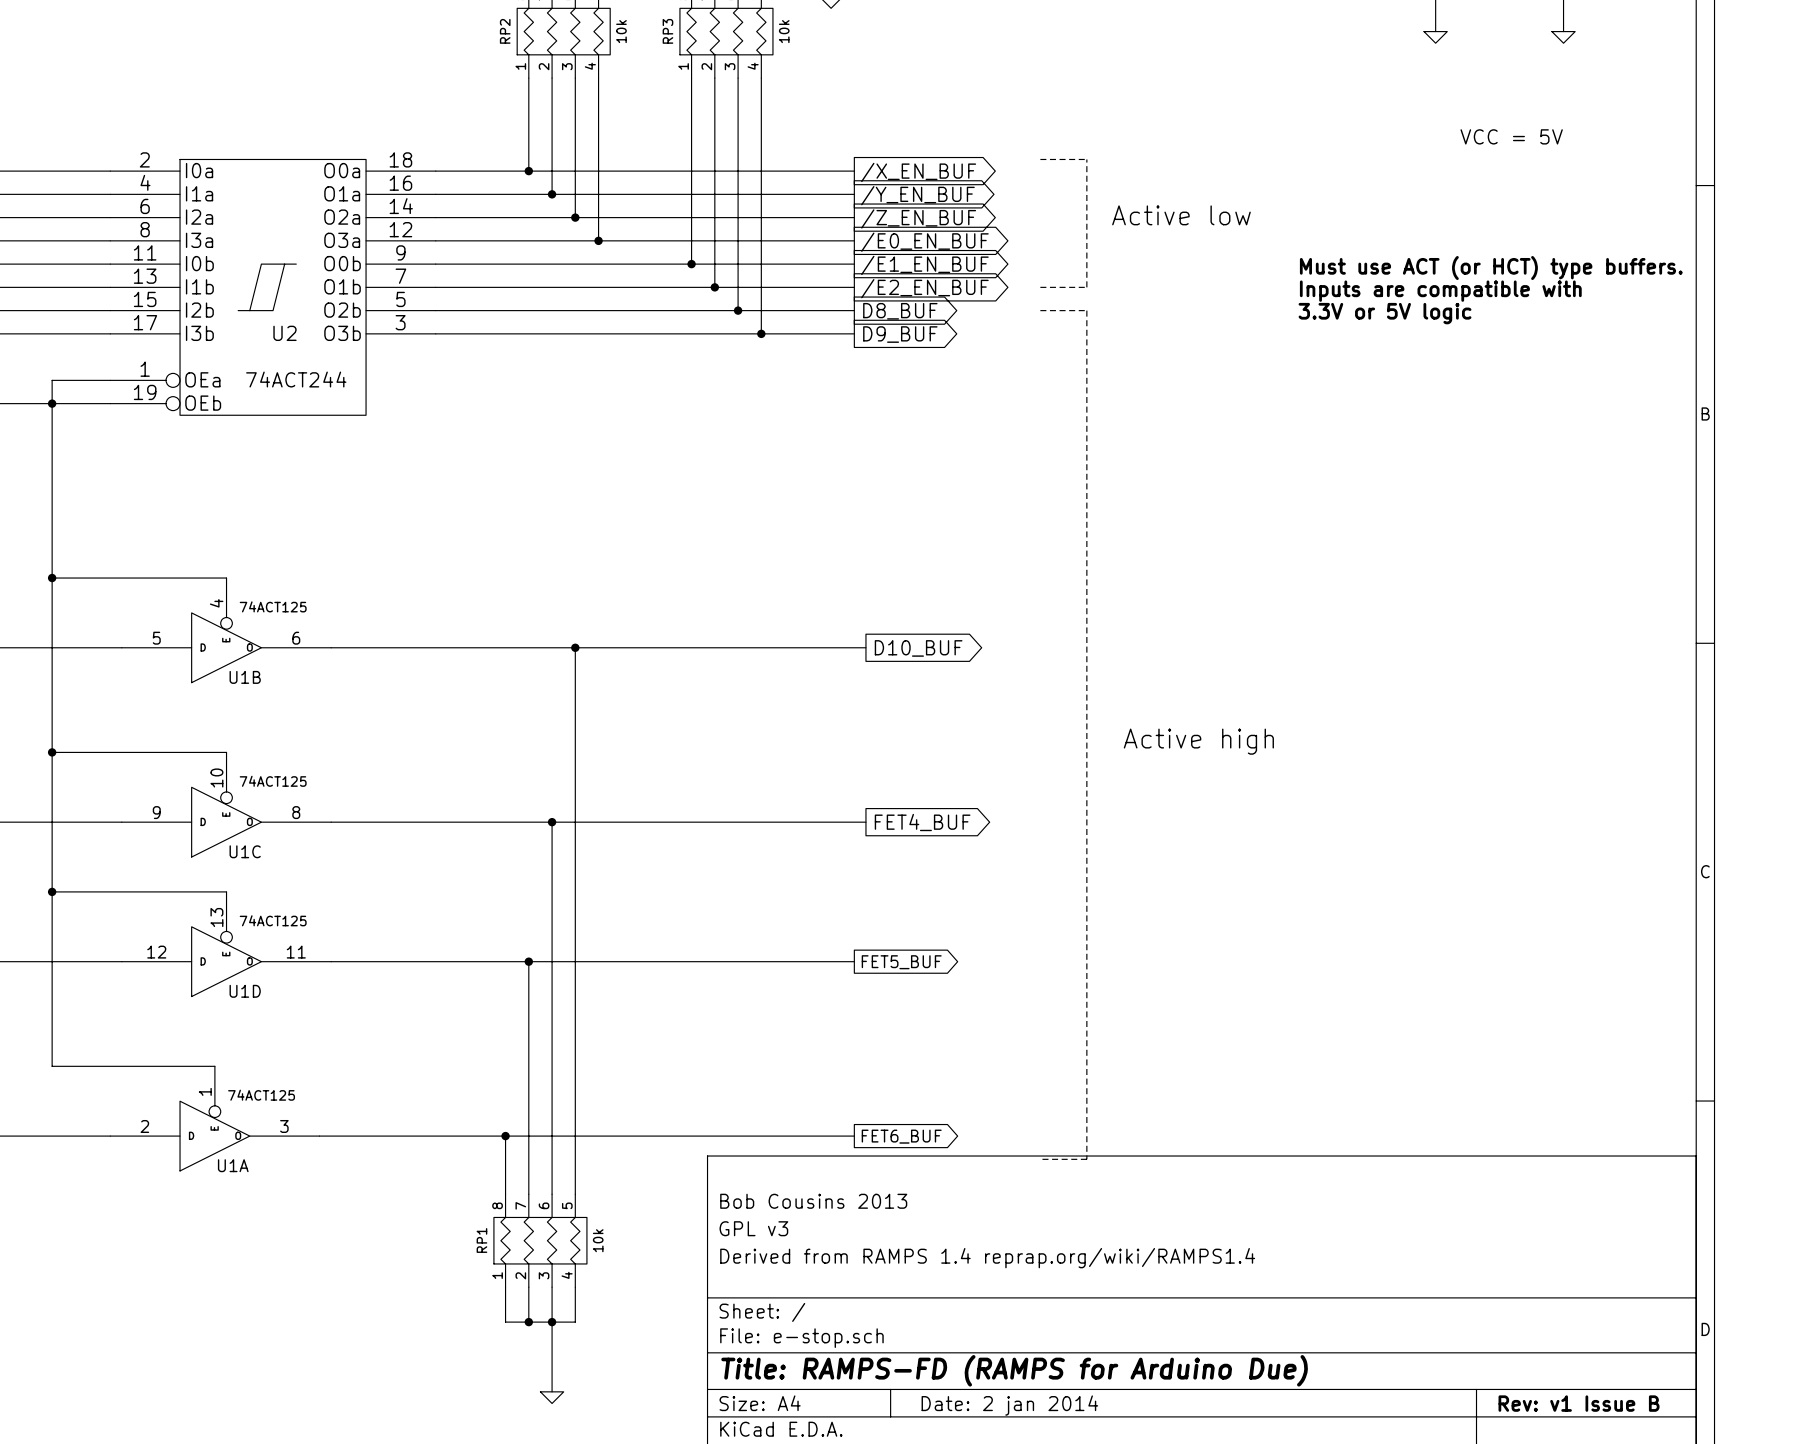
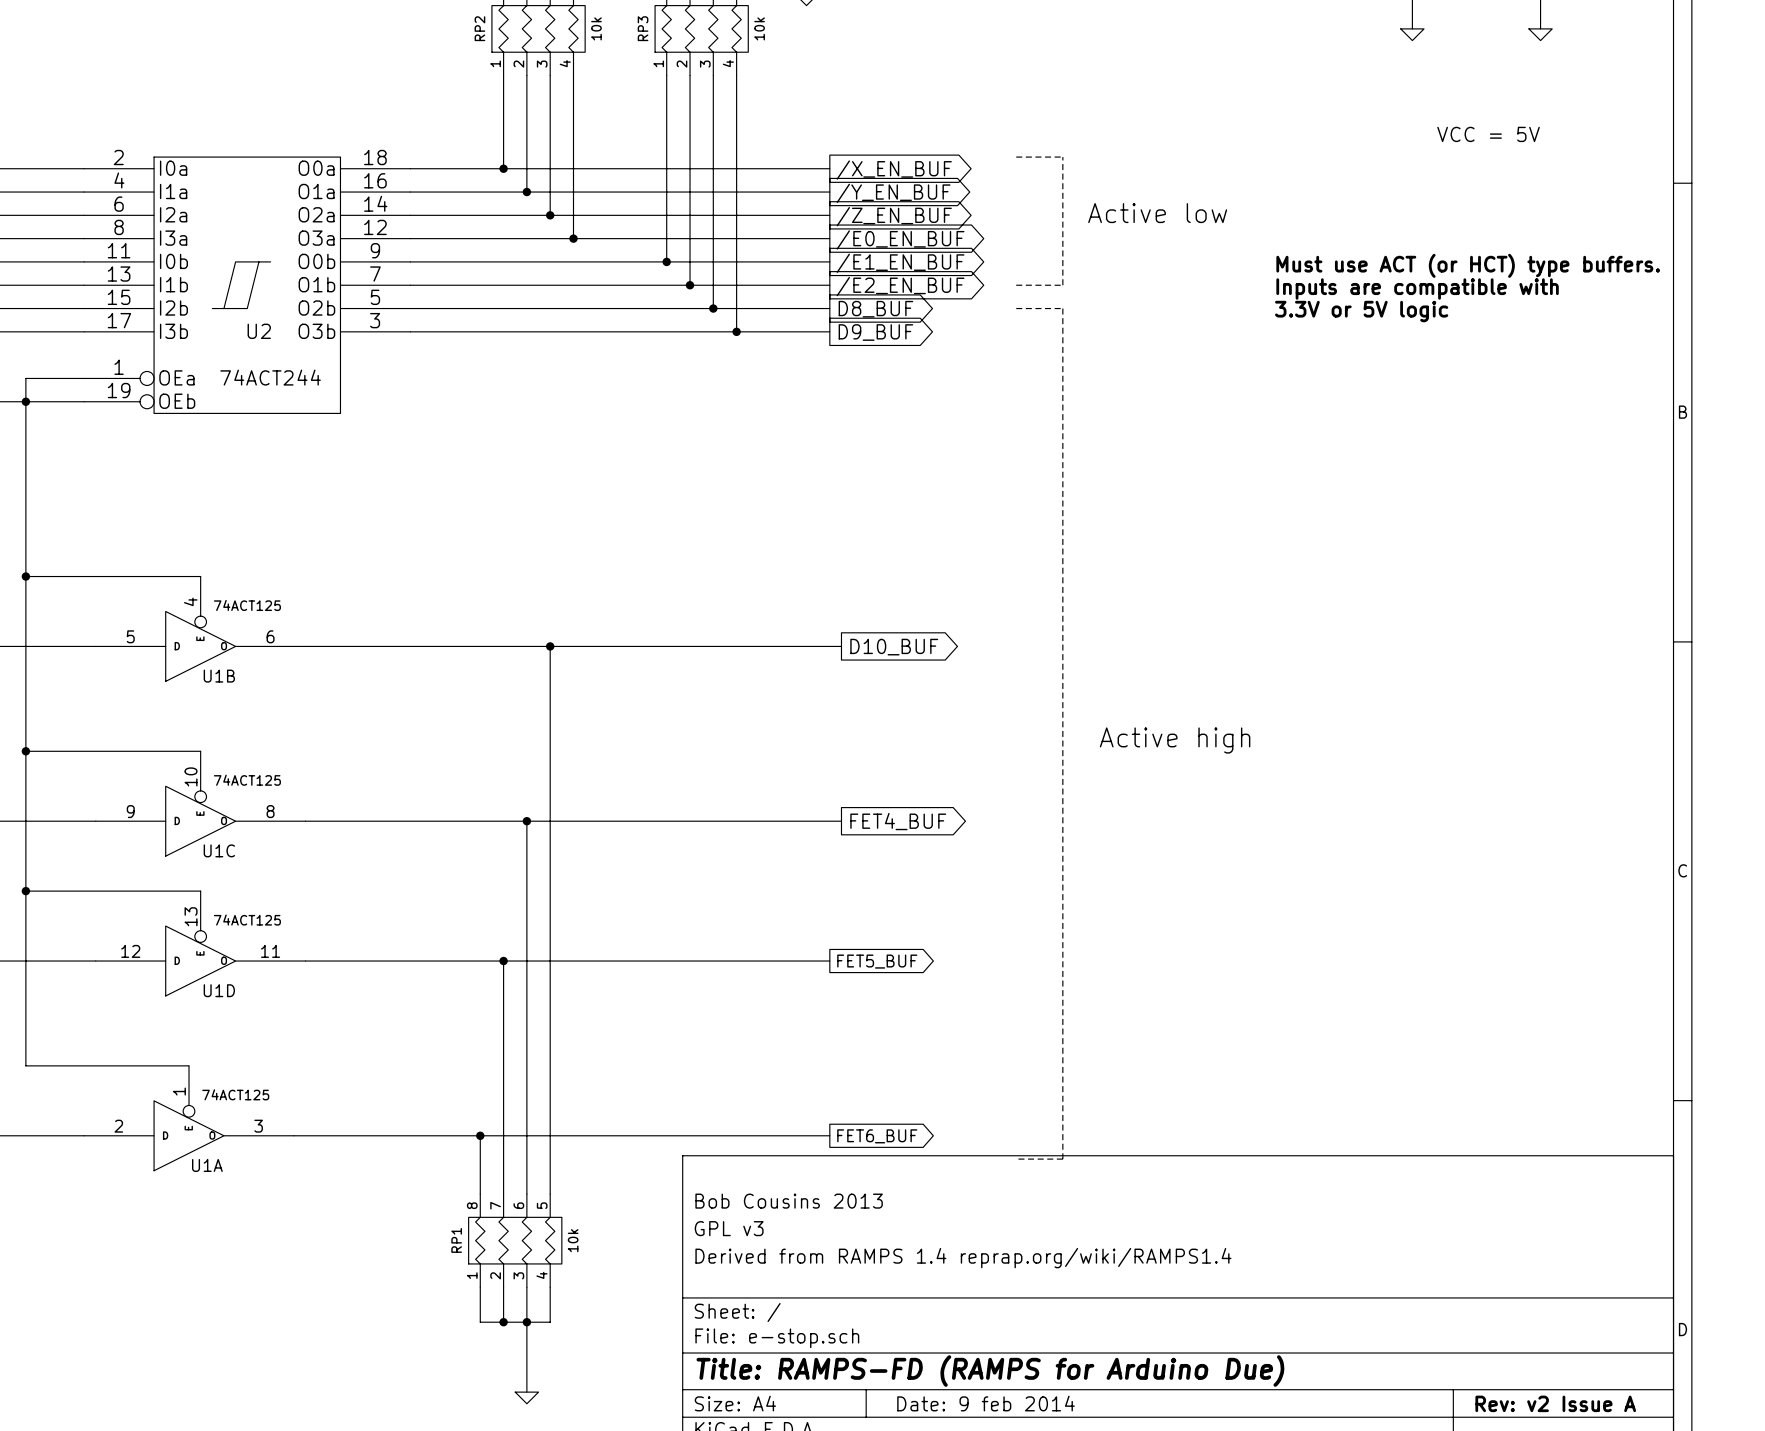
title block: Rev: v1 Issue B (1579, 1403) -> Rev: v2 Issue A (1555, 1403)
title block: Date: 2 jan 2014 (1009, 1405) -> Date: 9 feb 2014 (986, 1403)

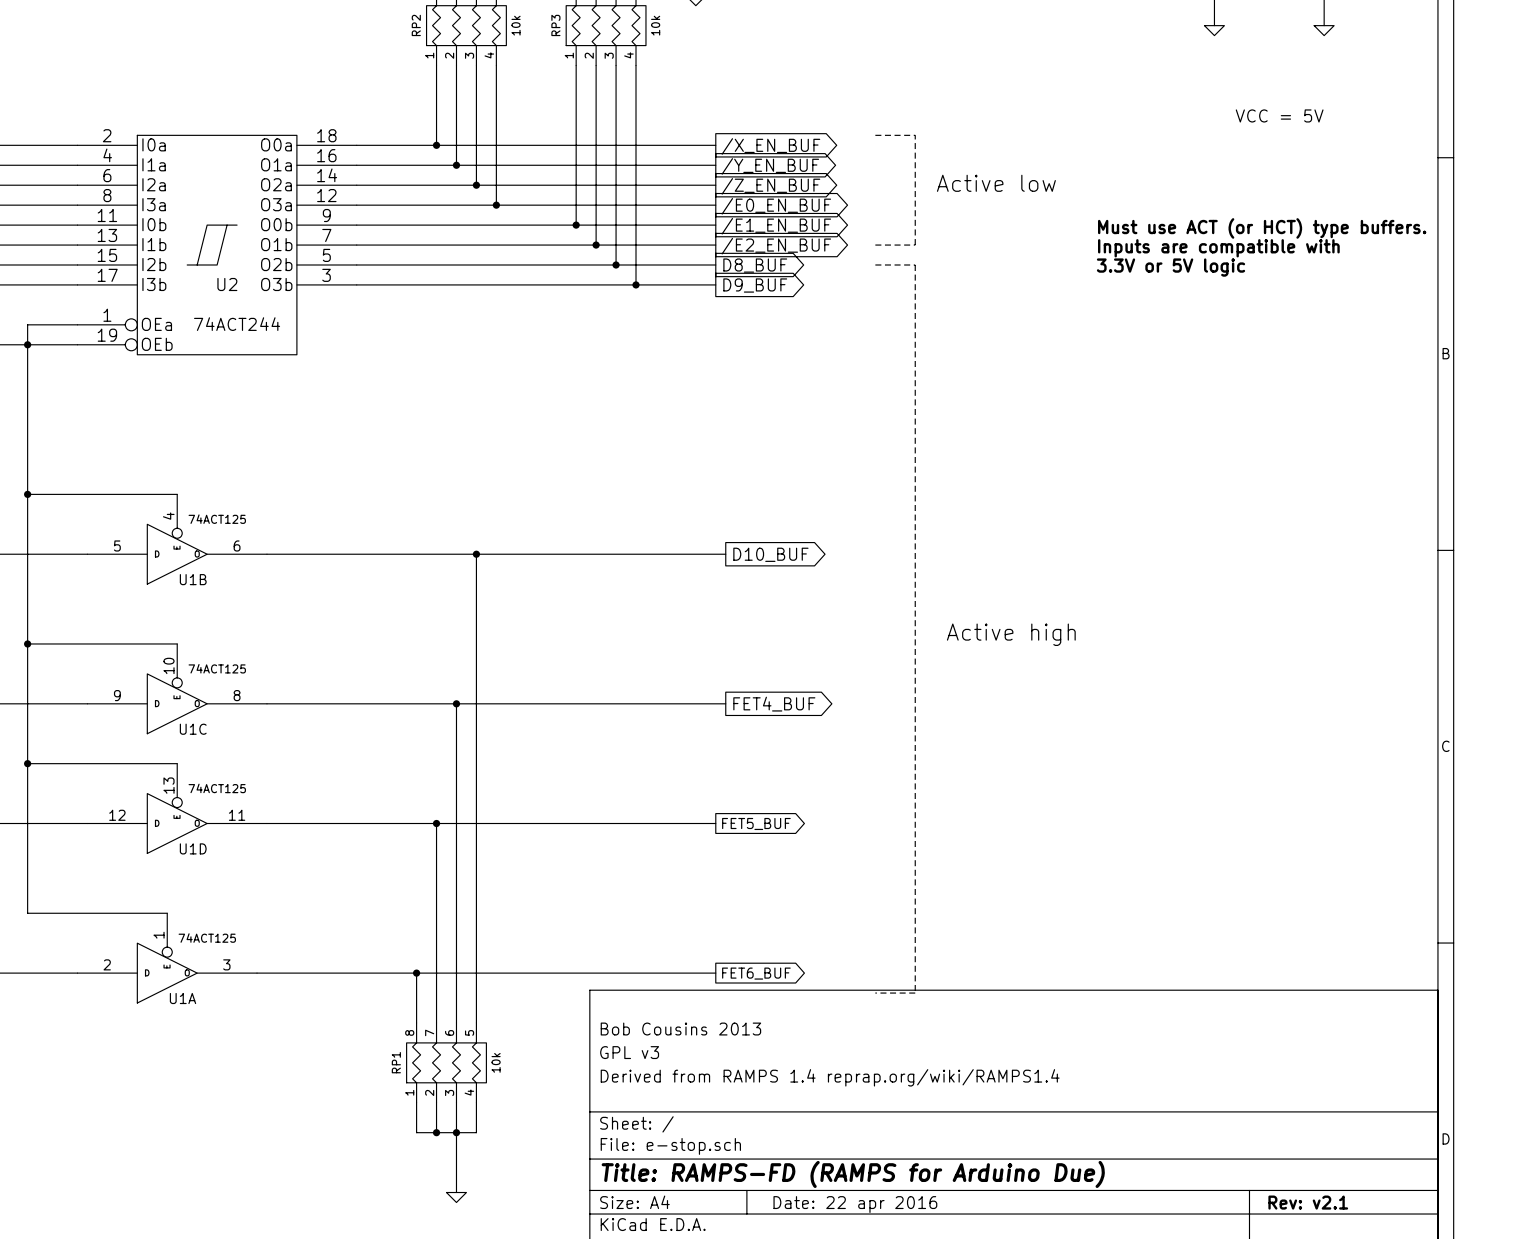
title block: Date: 9 feb 2014 (986, 1403) -> Date: 22 apr 2016 (855, 1204)
title block: Rev: v2 Issue A (1555, 1403) -> Rev: v2.1 (1308, 1202)

